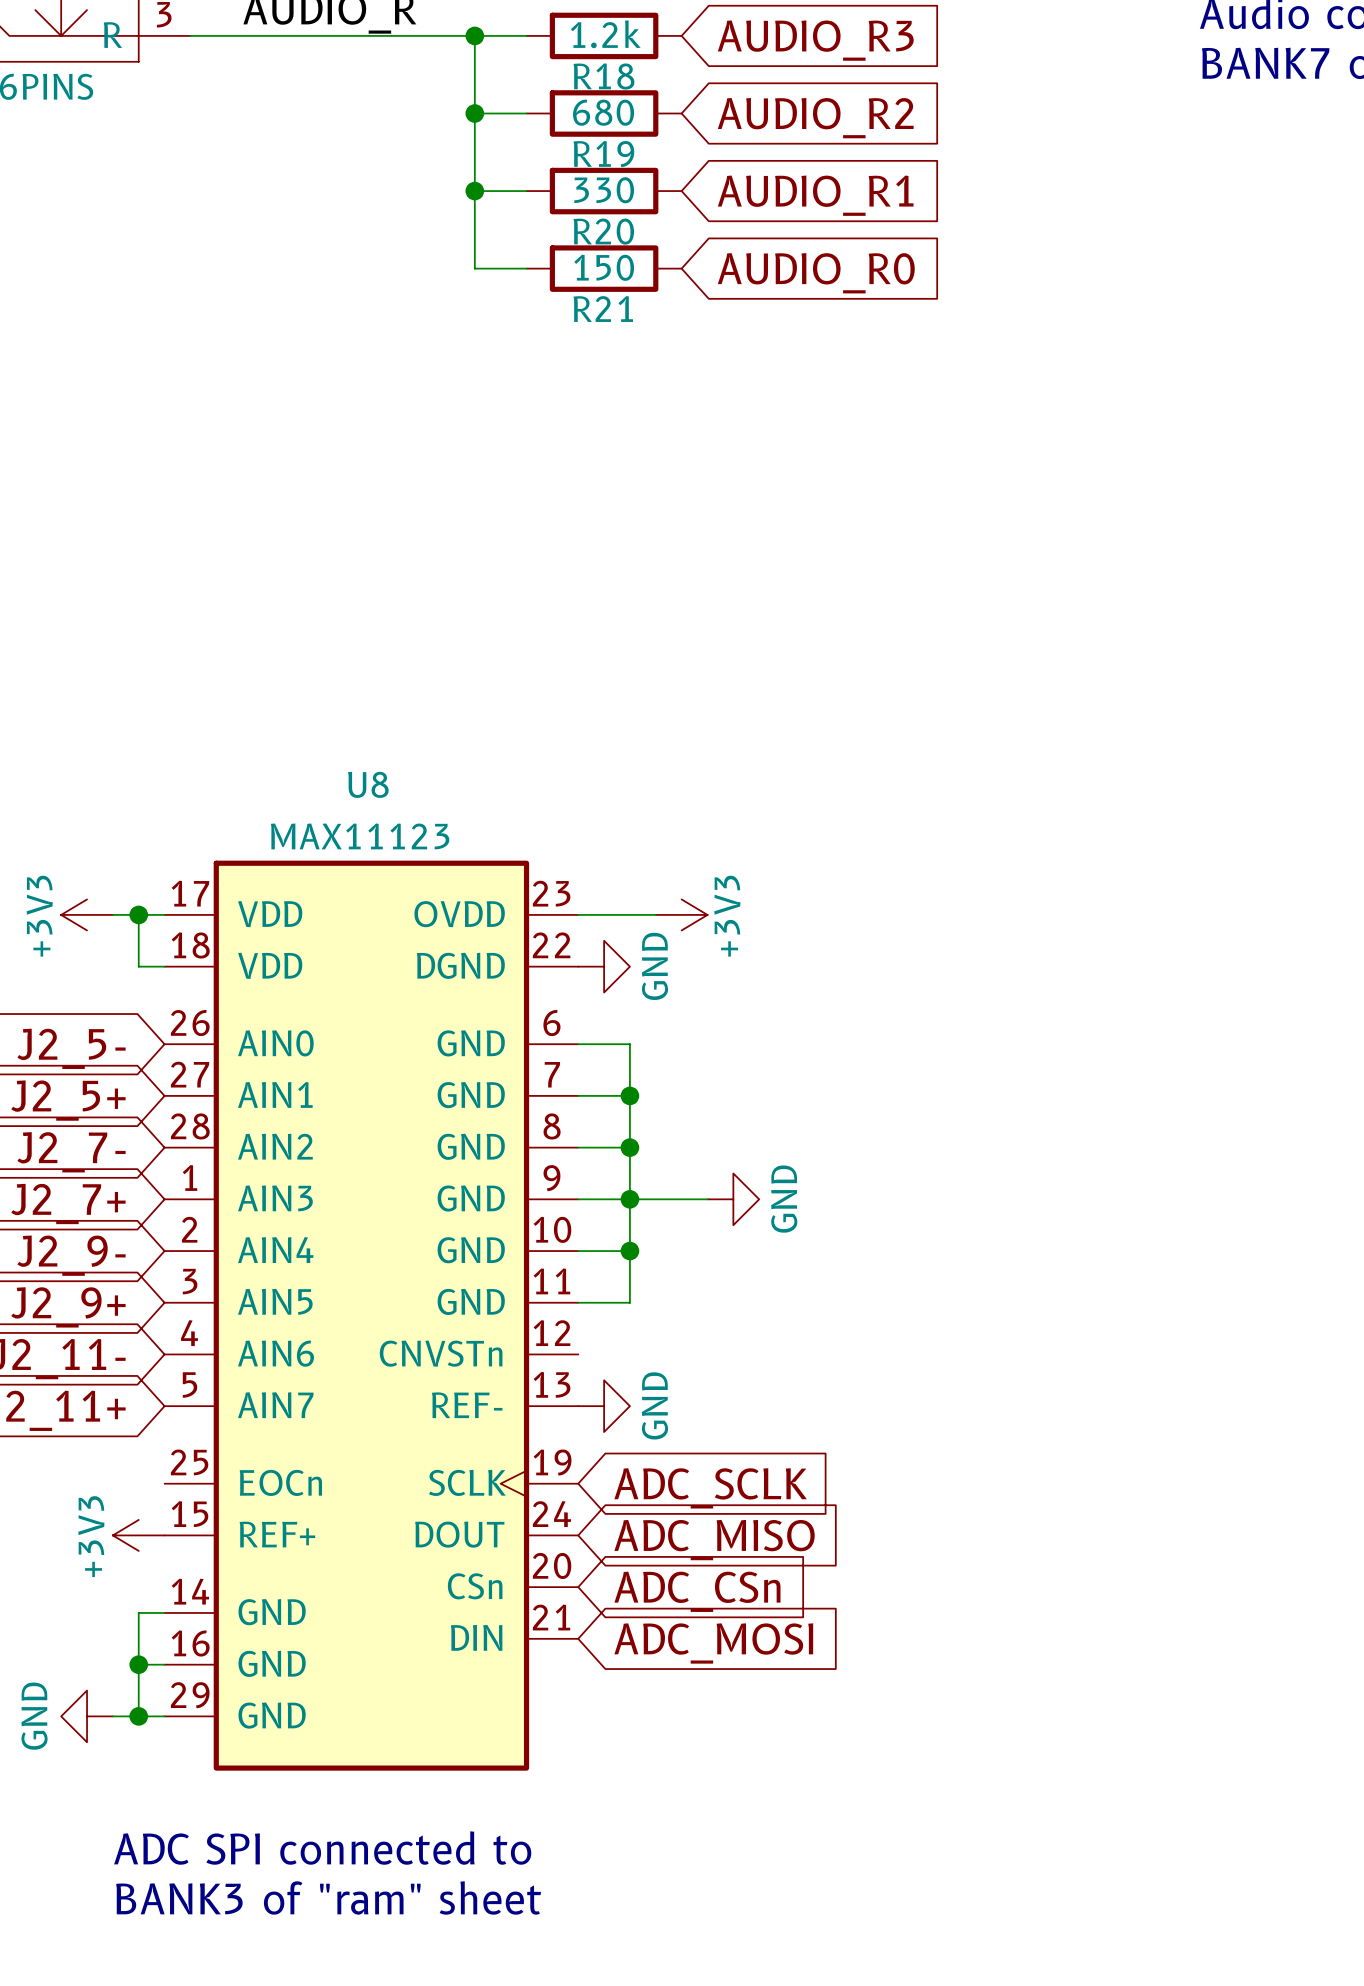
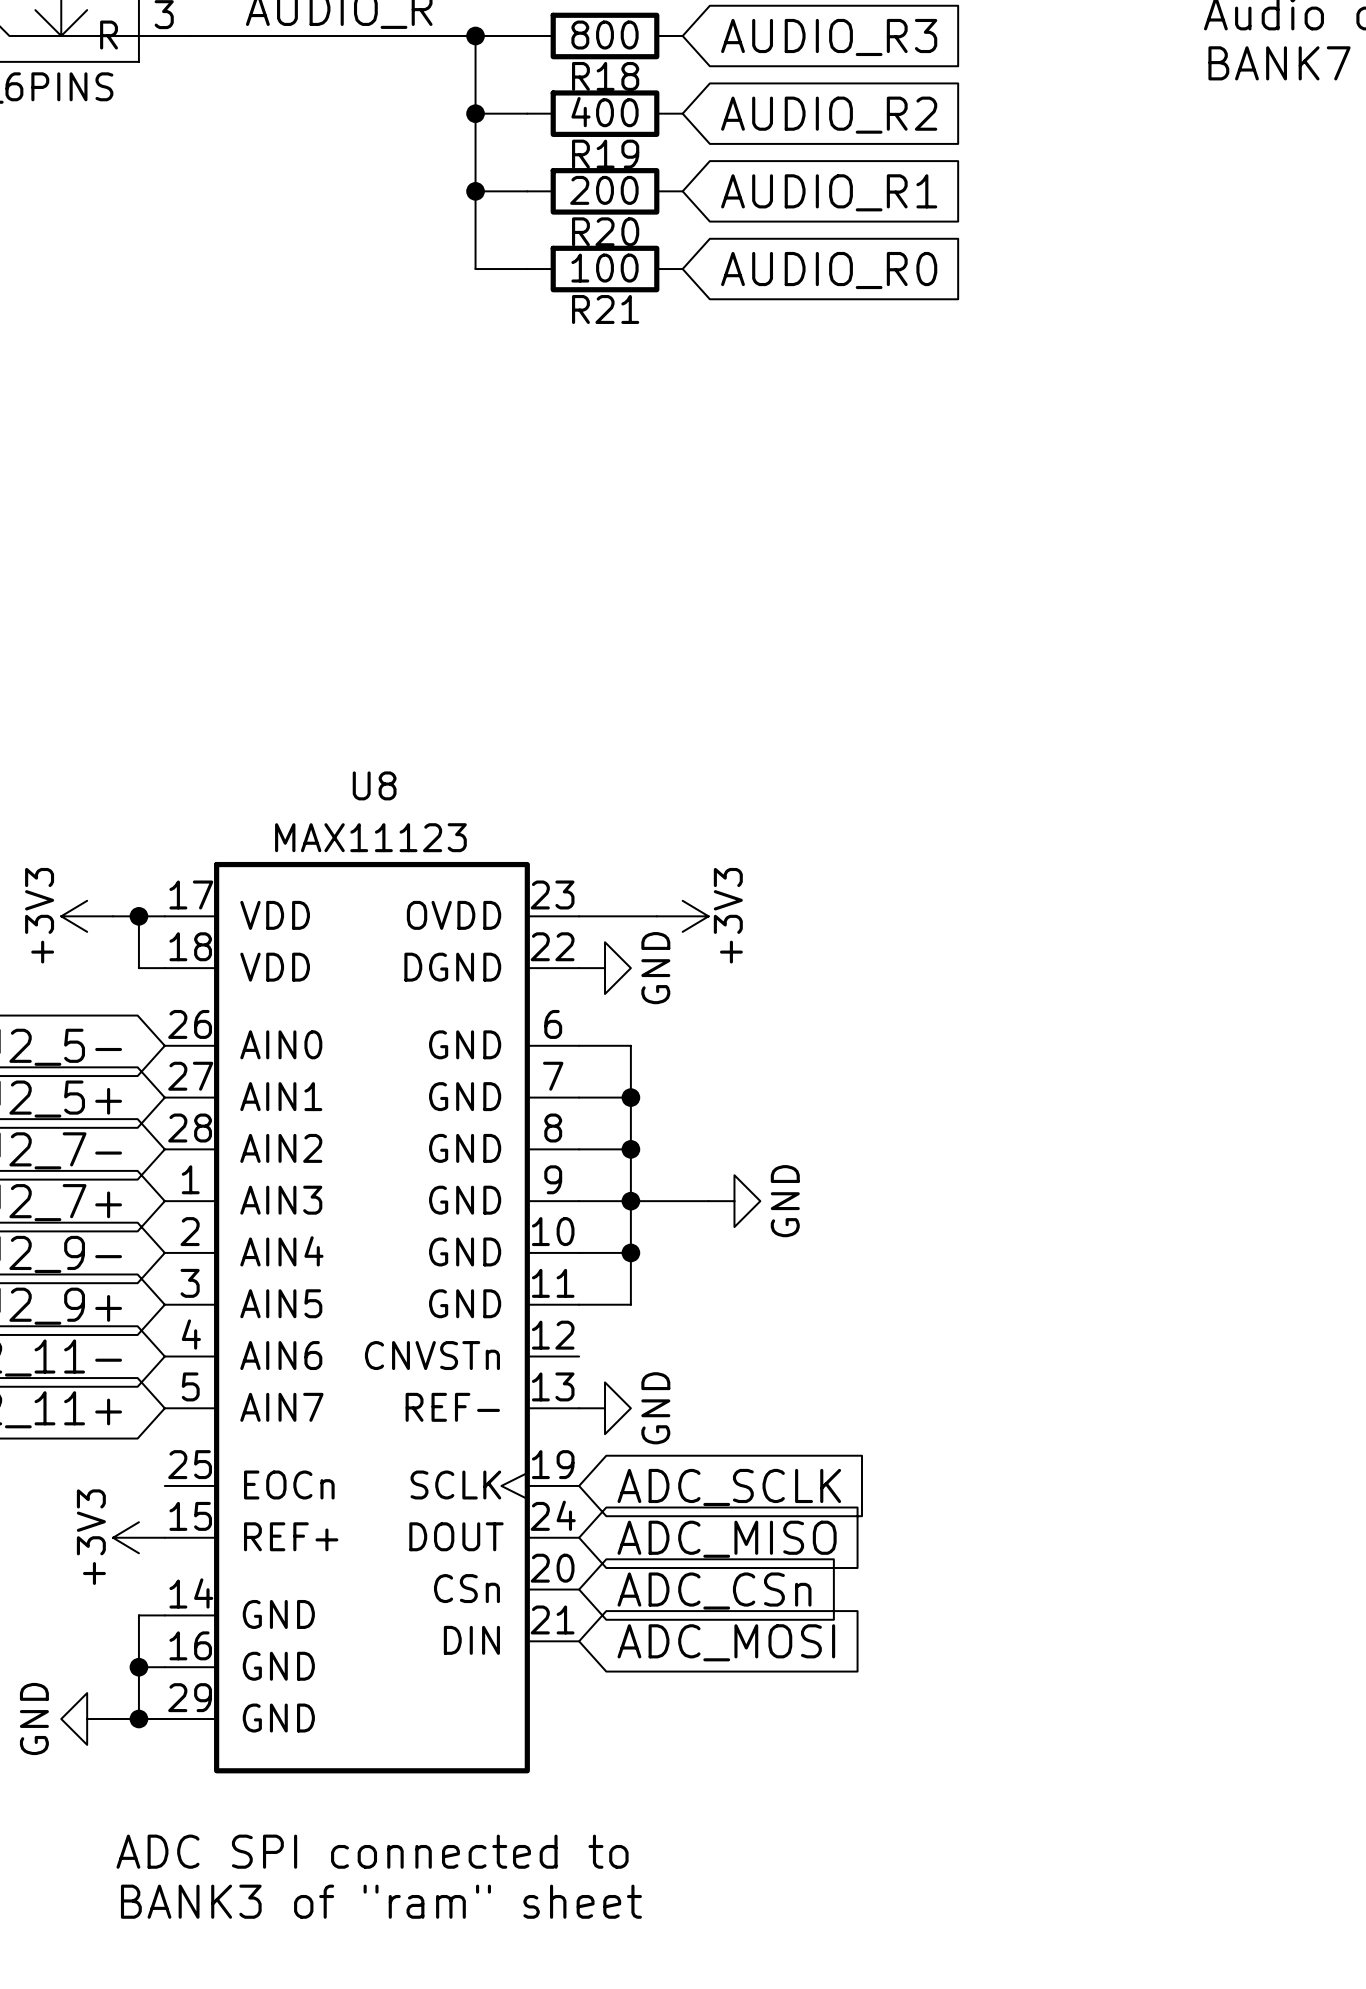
R18 value: 1.2k (605, 34) -> 800 (605, 35)
R19 value: 680 (603, 112) -> 400 (605, 112)
R20 value: 330 (604, 190) -> 200 (604, 190)
R21 value: 150 (604, 267) -> 100 (605, 268)

